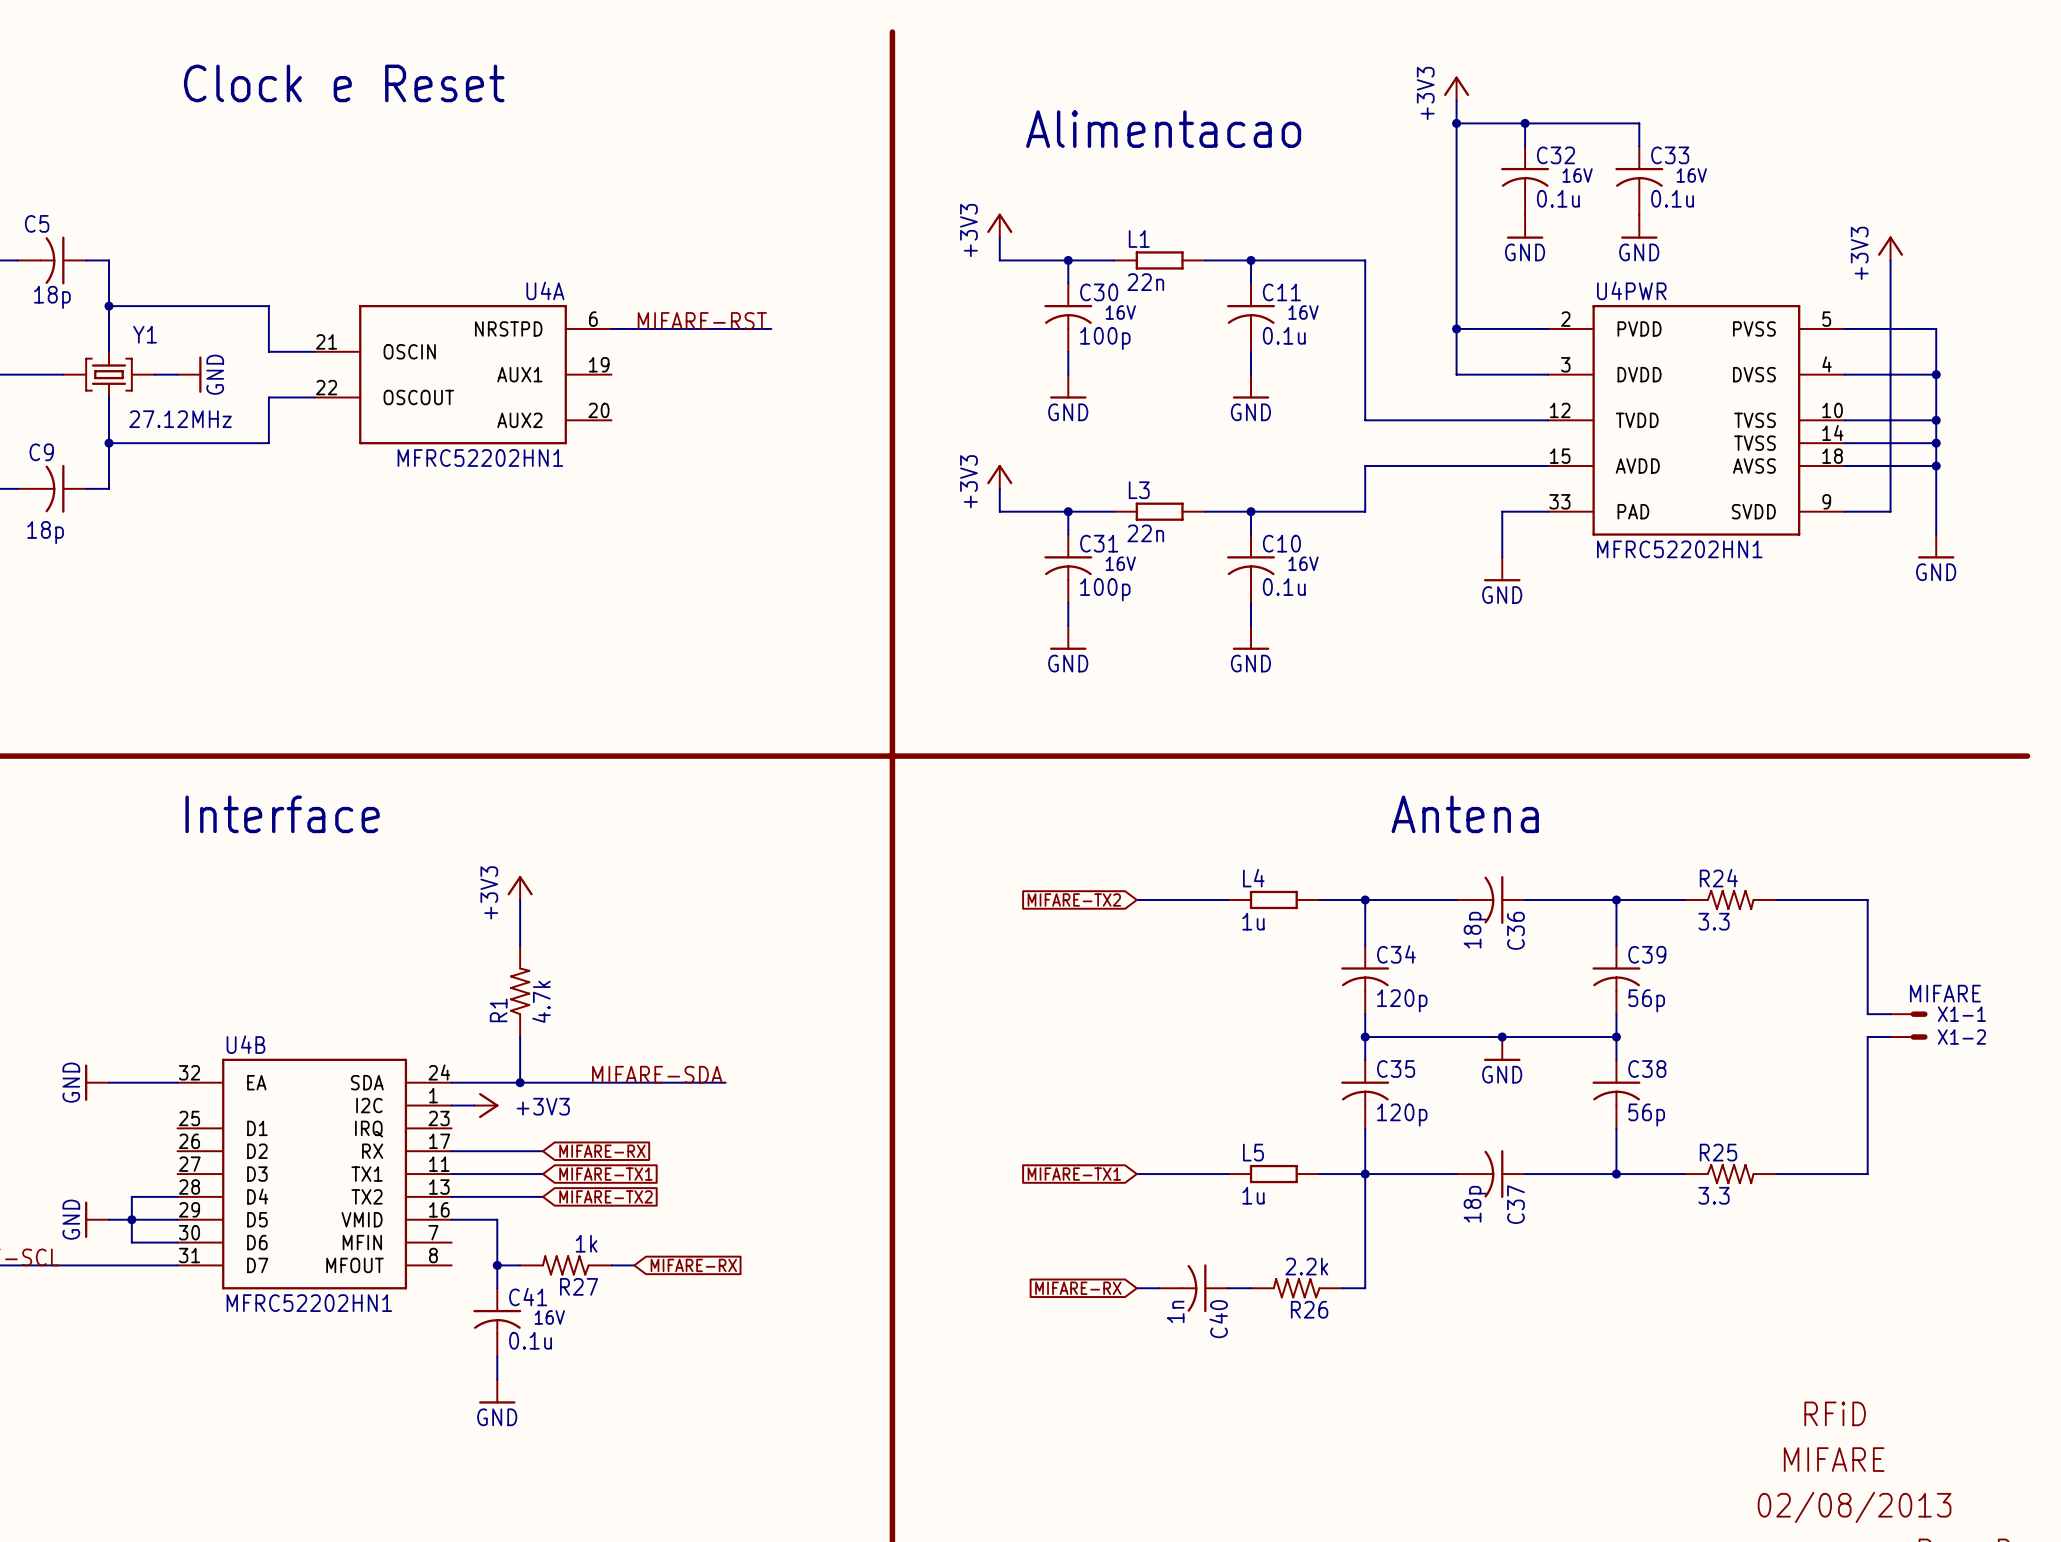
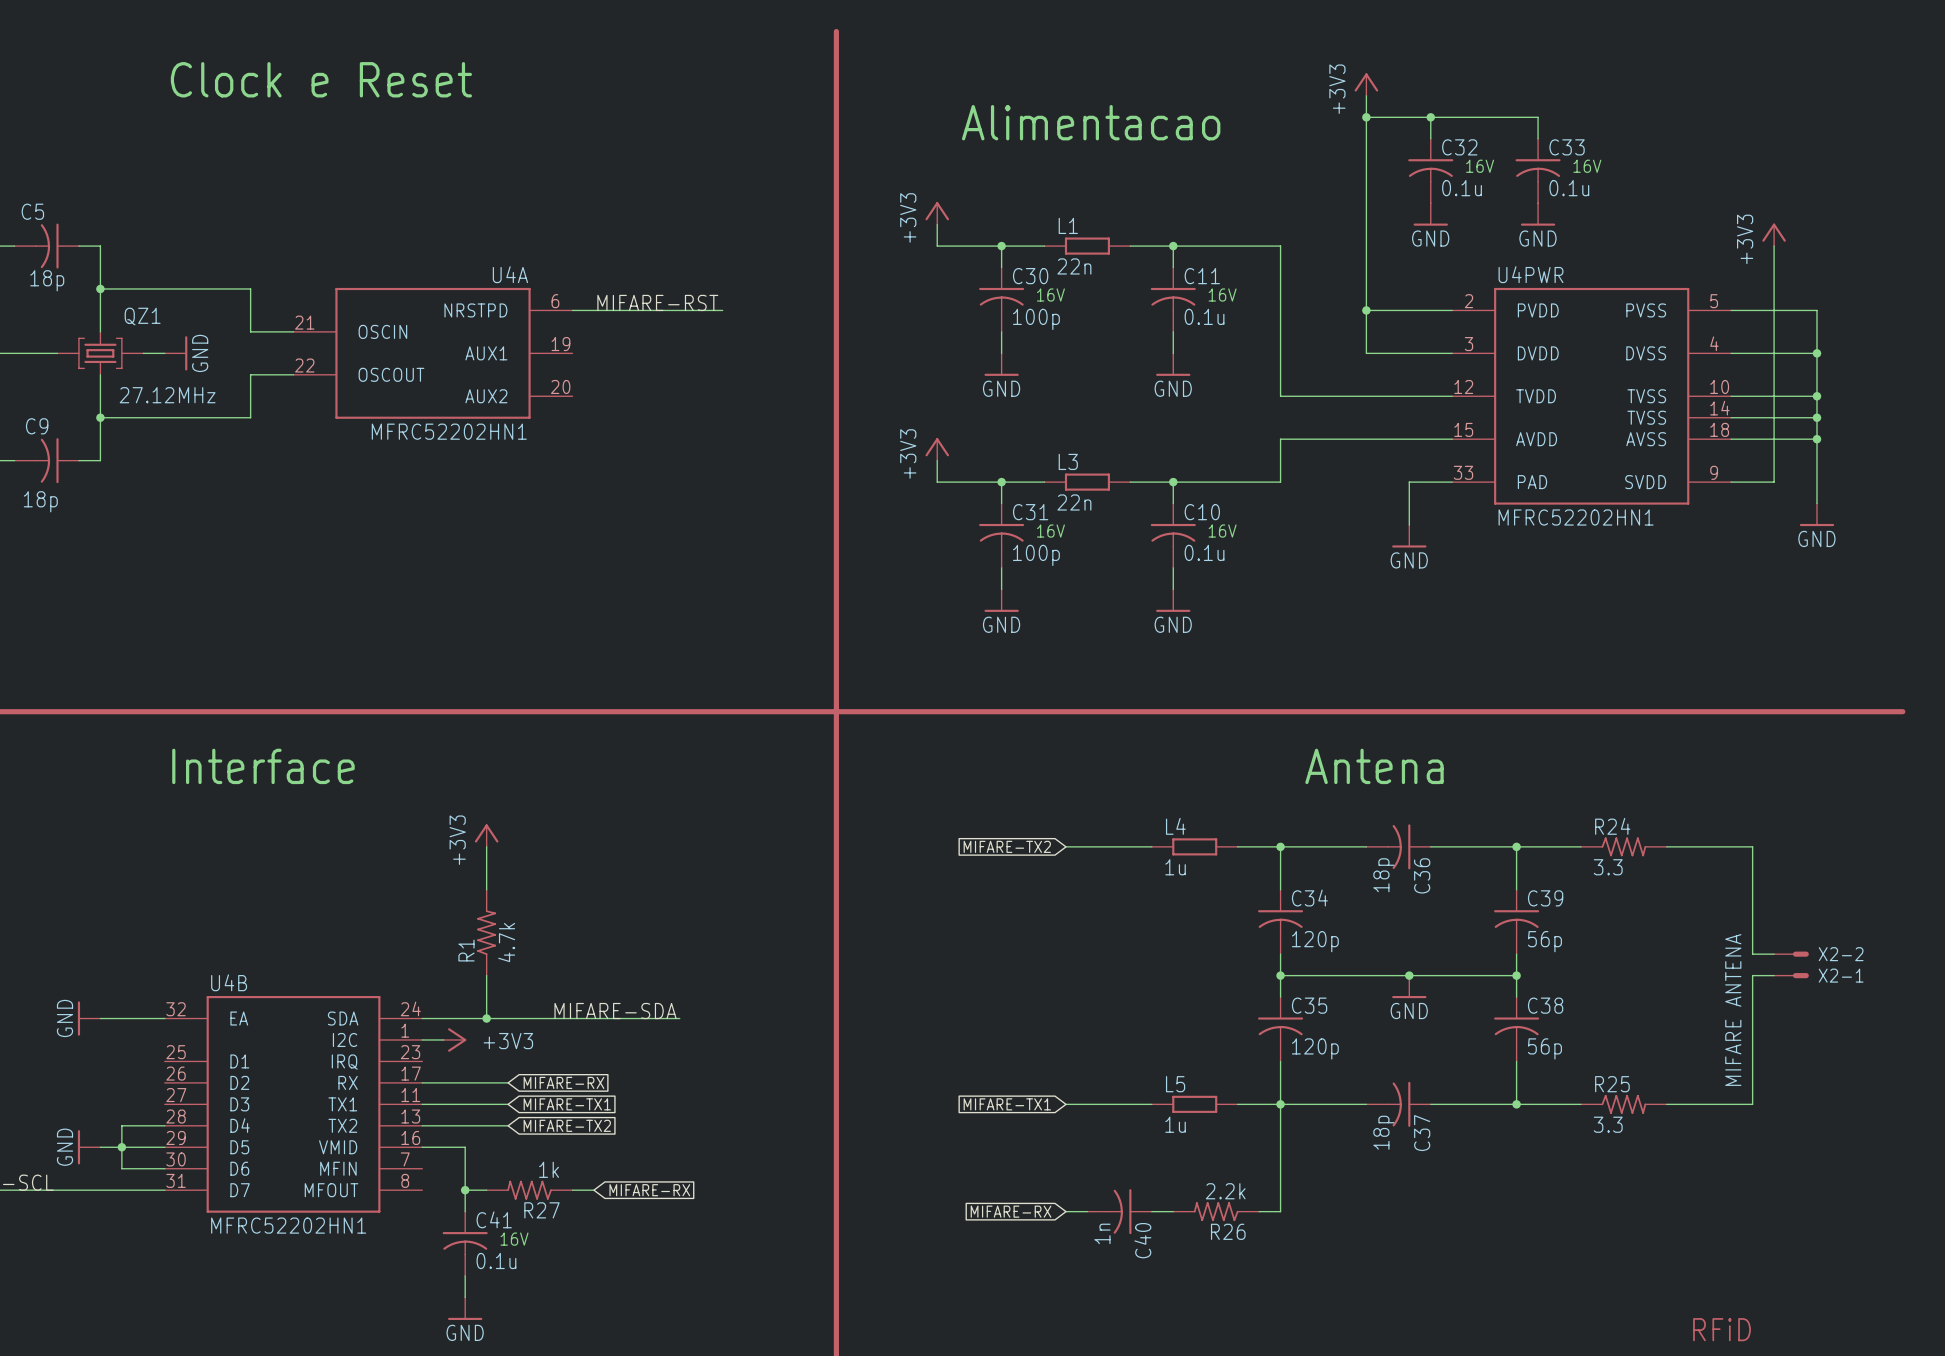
Y1 name: Y1 (145, 334) -> QZ1 (142, 316)
X1-1 value: MIFARE (1945, 993) -> none
X1-1 name: X1-1 (1961, 1014) -> X2-2 (1841, 954)
X1-2 name: X1-2 (1961, 1037) -> X2-1 (1841, 975)
X1-2 value: none -> MIFARE ANTENA (1733, 1010)

